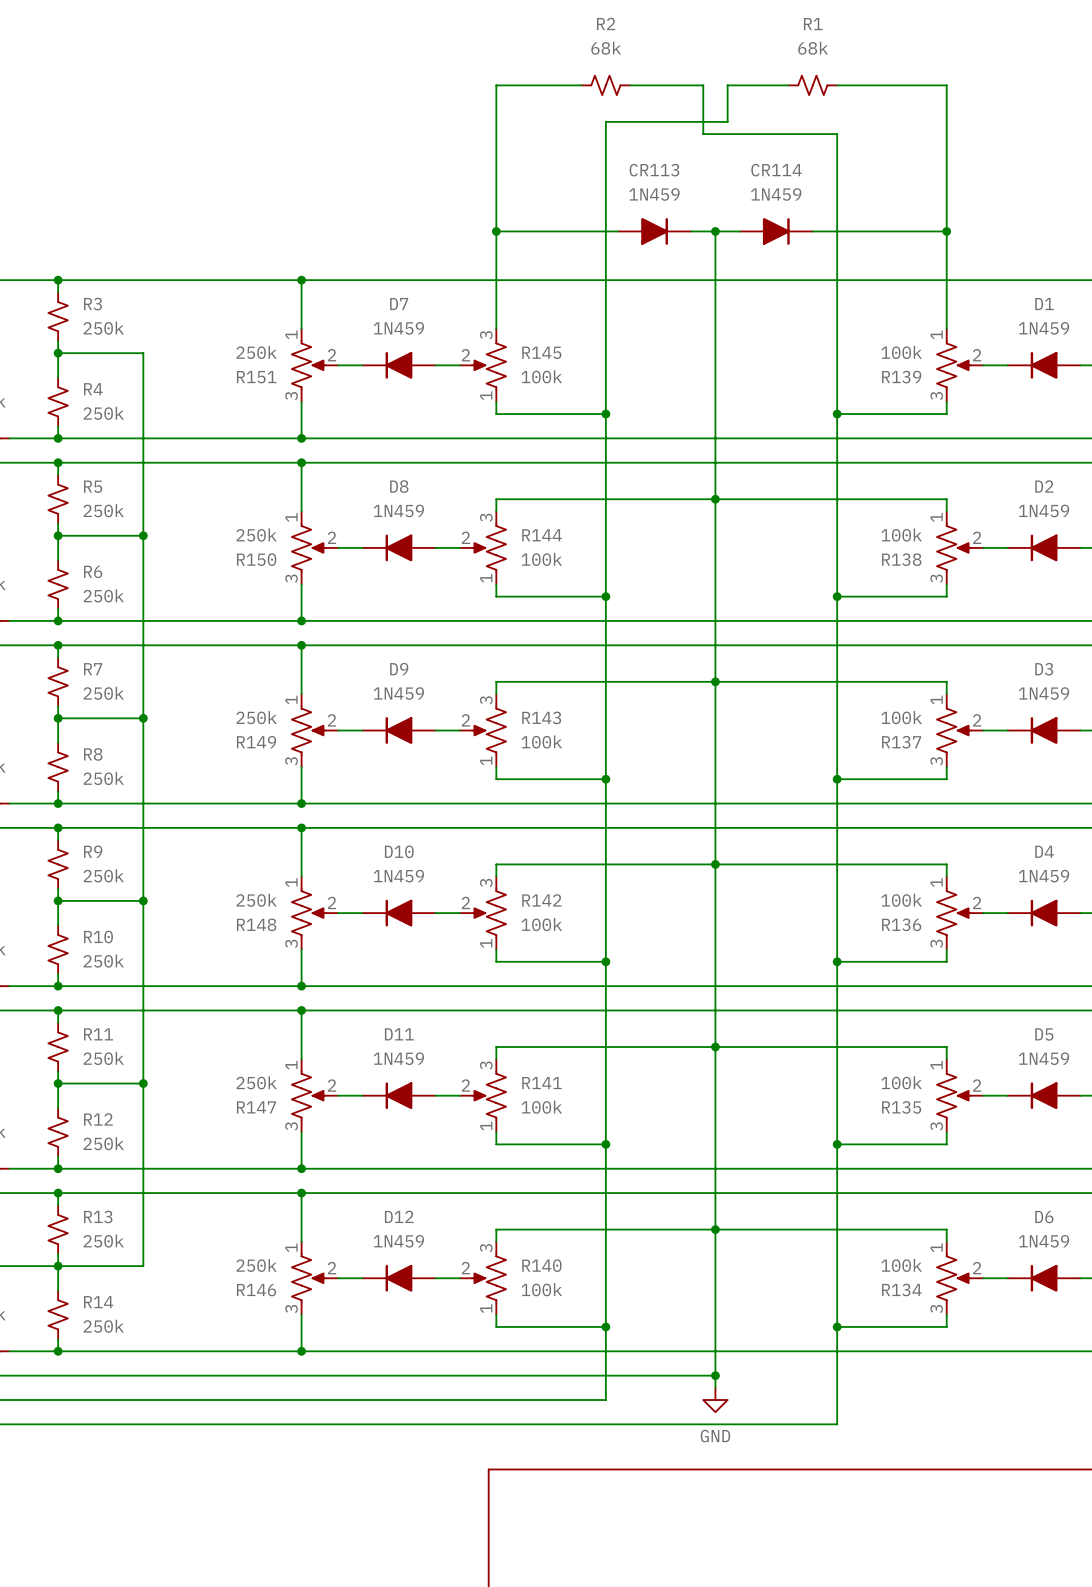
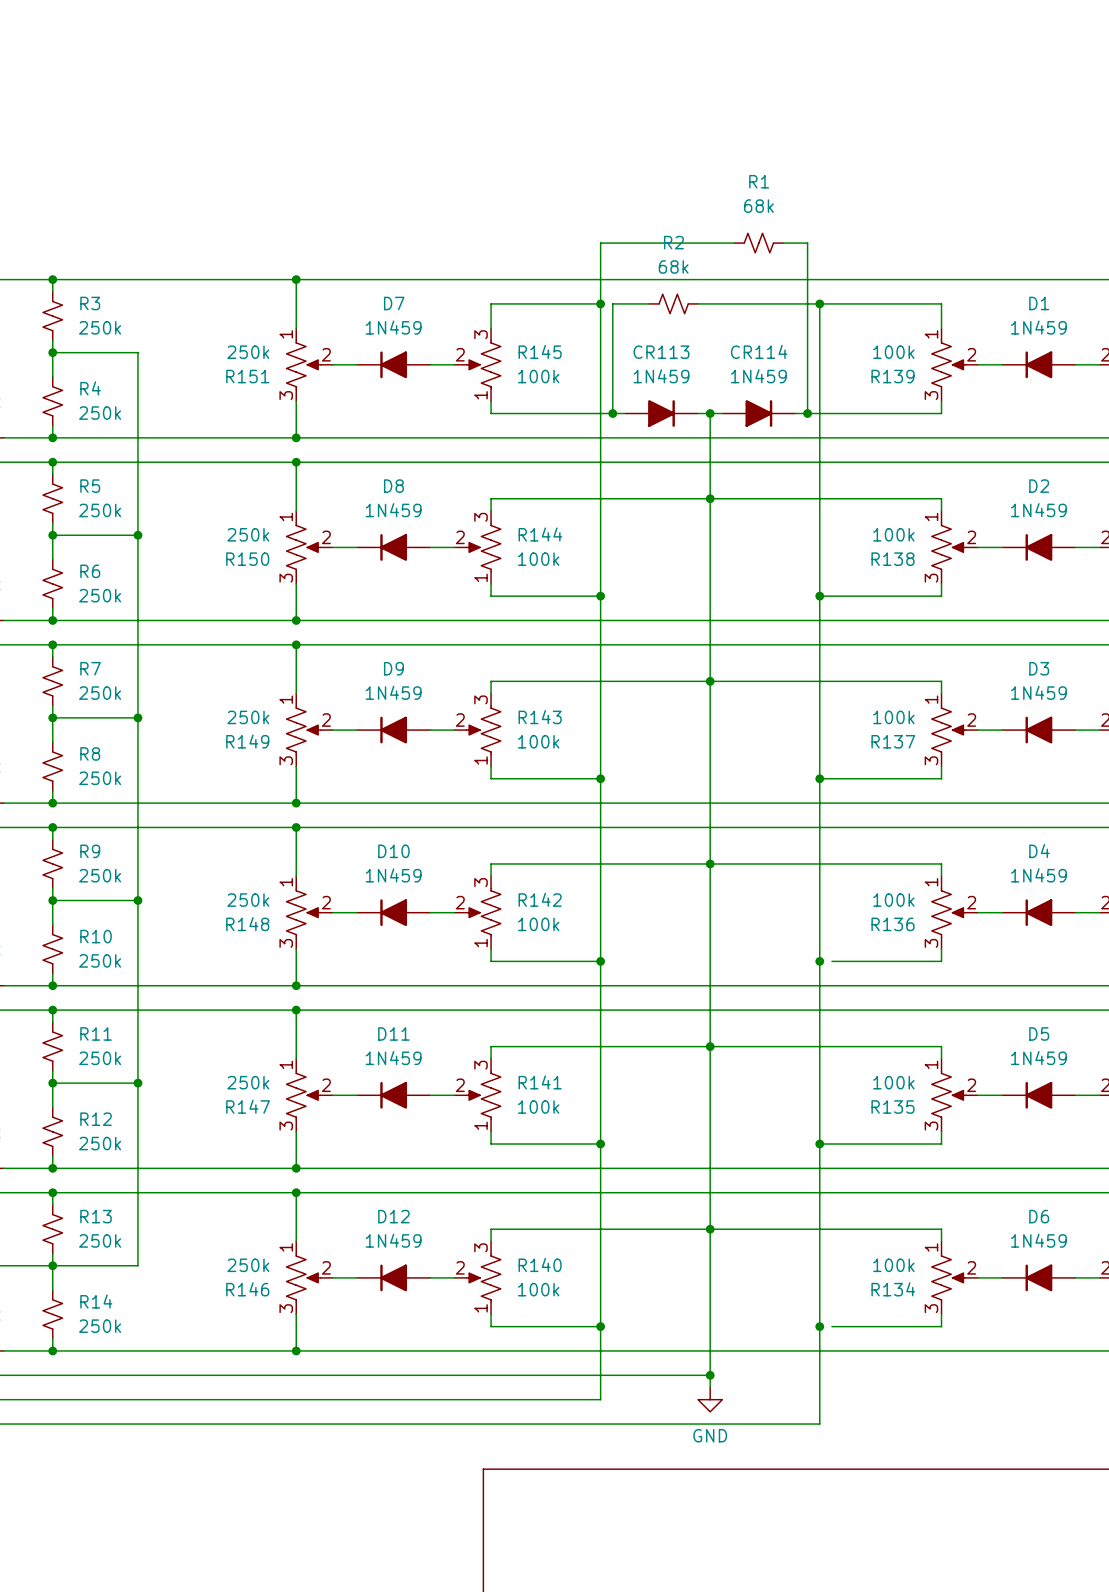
wire: (581, 85) (496, 85) (496, 304) -> (600, 303) (491, 303)
R2 position: (605, 85) -> (673, 303)
wire: (630, 85) (703, 85) (703, 134) (837, 134) (837, 1424) (824, 1424) -> (819, 303) (819, 1424)
wire: (788, 85) (727, 85) (727, 121) (605, 121) (605, 243) -> (734, 243) (600, 243)
R1 position: (812, 85) -> (758, 243)
wire: (837, 85) (946, 85) (946, 304) -> (698, 303) (941, 303)
wire: (496, 231) (618, 231) -> none
junction: (496, 231) -> none
CR113 position: (654, 231) -> (661, 413)
wire: (691, 231) (739, 231) -> none
wire: (715, 231) (715, 414) -> none
junction: (715, 231) -> none
CR114 position: (776, 231) -> (758, 413)
wire: (812, 231) (946, 231) -> none
junction: (946, 231) -> none
wire: none -> (783, 243) (807, 243) (807, 413)
junction: none -> (600, 303)
wire: none -> (649, 303) (612, 303) (612, 413)
junction: none -> (819, 303)
wire: none -> (600, 413) (624, 413)
junction position: (605, 414) -> (612, 413)
wire: none -> (698, 413) (722, 413)
junction: none -> (710, 413)
wire: none -> (795, 413) (831, 413)
junction position: (837, 414) -> (807, 413)
wire: none -> (819, 596) (831, 596)
junction position: (837, 596) -> (819, 596)
wire: none -> (819, 778) (831, 778)
junction position: (837, 779) -> (819, 778)
junction position: (837, 961) -> (819, 961)
wire: none -> (819, 1144) (831, 1144)
junction position: (837, 1144) -> (819, 1144)
junction position: (837, 1326) -> (819, 1326)

